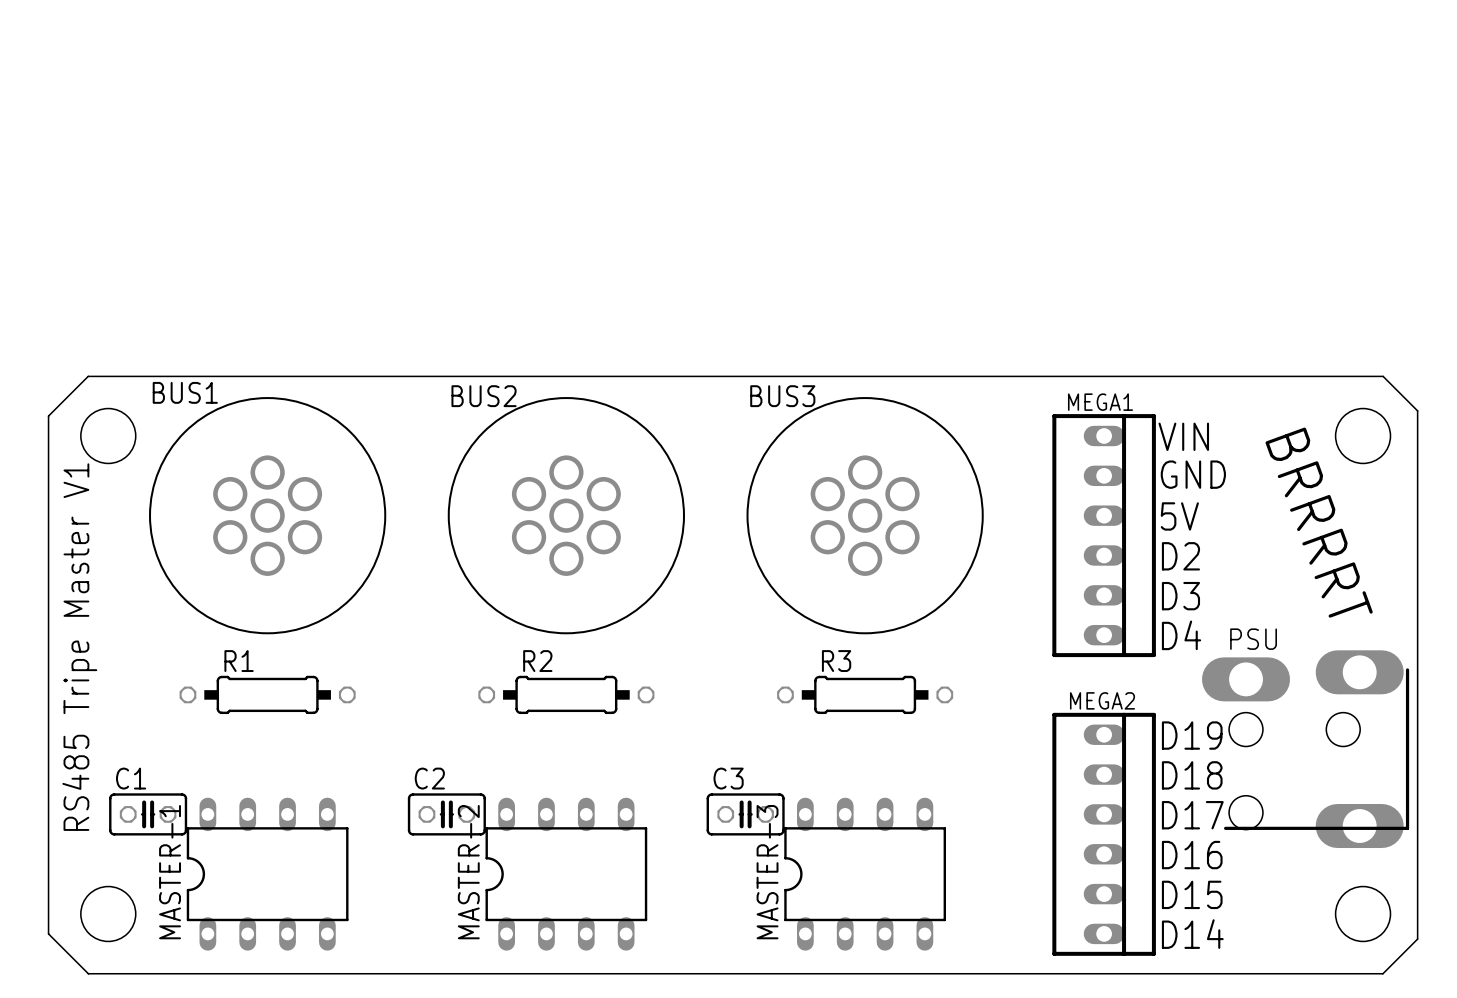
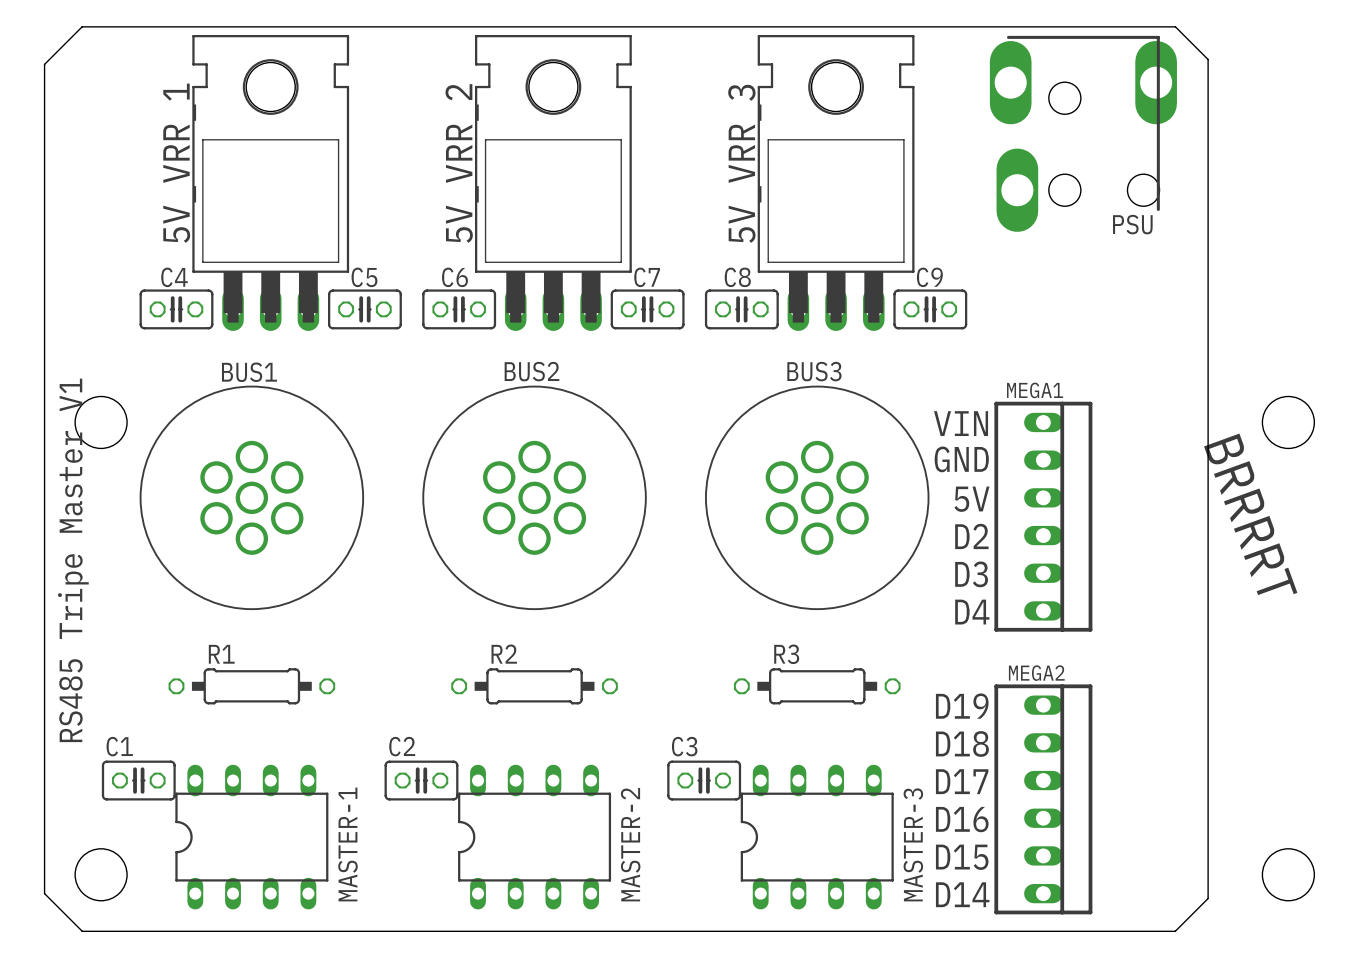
PSU: none -> (1083, 133)
5V_VRR_1: none -> (270, 182)
5V_VRR_2: none -> (553, 182)
5V_VRR_3: none -> (836, 182)
C4: none -> (176, 309)
C5: none -> (364, 309)
C6: none -> (459, 309)
C7: none -> (647, 309)
C8: none -> (741, 309)
C9: none -> (930, 309)
BUS1 name position: BUS1 (185, 392) -> BUS1 (249, 372)
BUS2 name position: BUS2 (484, 396) -> BUS2 (531, 371)
BUS3 name position: BUS3 (782, 396) -> BUS3 (814, 371)
board edge: (48, 416) (88, 376) (1383, 376) (1417, 410) (1417, 939) (1382, 973) (1243, 973) -> (44, 403) (44, 64) (82, 26) (1175, 26) (1208, 59) (1208, 898) (1175, 931)
text position: VIN (1183, 436) -> VIN (961, 423)
text position: GND (1193, 474) -> GND (961, 459)
text position: 5V (1179, 516) -> 5V (971, 499)
text position: D2 (1180, 556) -> D2 (971, 536)
text position: D3 (1180, 596) -> D3 (971, 574)
text position: D4 (1181, 635) -> D4 (972, 612)
text position: RS485 Tripe Master V1 (79, 647) -> RS485 Tripe Master V1 (73, 560)
R1 position: (267, 694) -> (251, 686)
R2 position: (566, 694) -> (534, 686)
R3 position: (865, 694) -> (817, 686)
text position: D19 (1192, 735) -> D19 (962, 706)
PSU: (1305, 749) -> none
text position: D18 (1192, 775) -> D18 (962, 743)
text position: D17 (1192, 815) -> D17 (962, 781)
text position: D16 (1192, 855) -> D16 (962, 819)
MASTER-1 name position: MASTER-1 (170, 872) -> MASTER-1 (347, 844)
MASTER-2 name position: MASTER-2 (468, 872) -> MASTER-2 (630, 844)
MASTER-3 name position: MASTER-3 (767, 872) -> MASTER-3 (913, 844)
text position: D15 (1192, 894) -> D15 (962, 857)
text position: D14 (1192, 934) -> D14 (962, 894)

